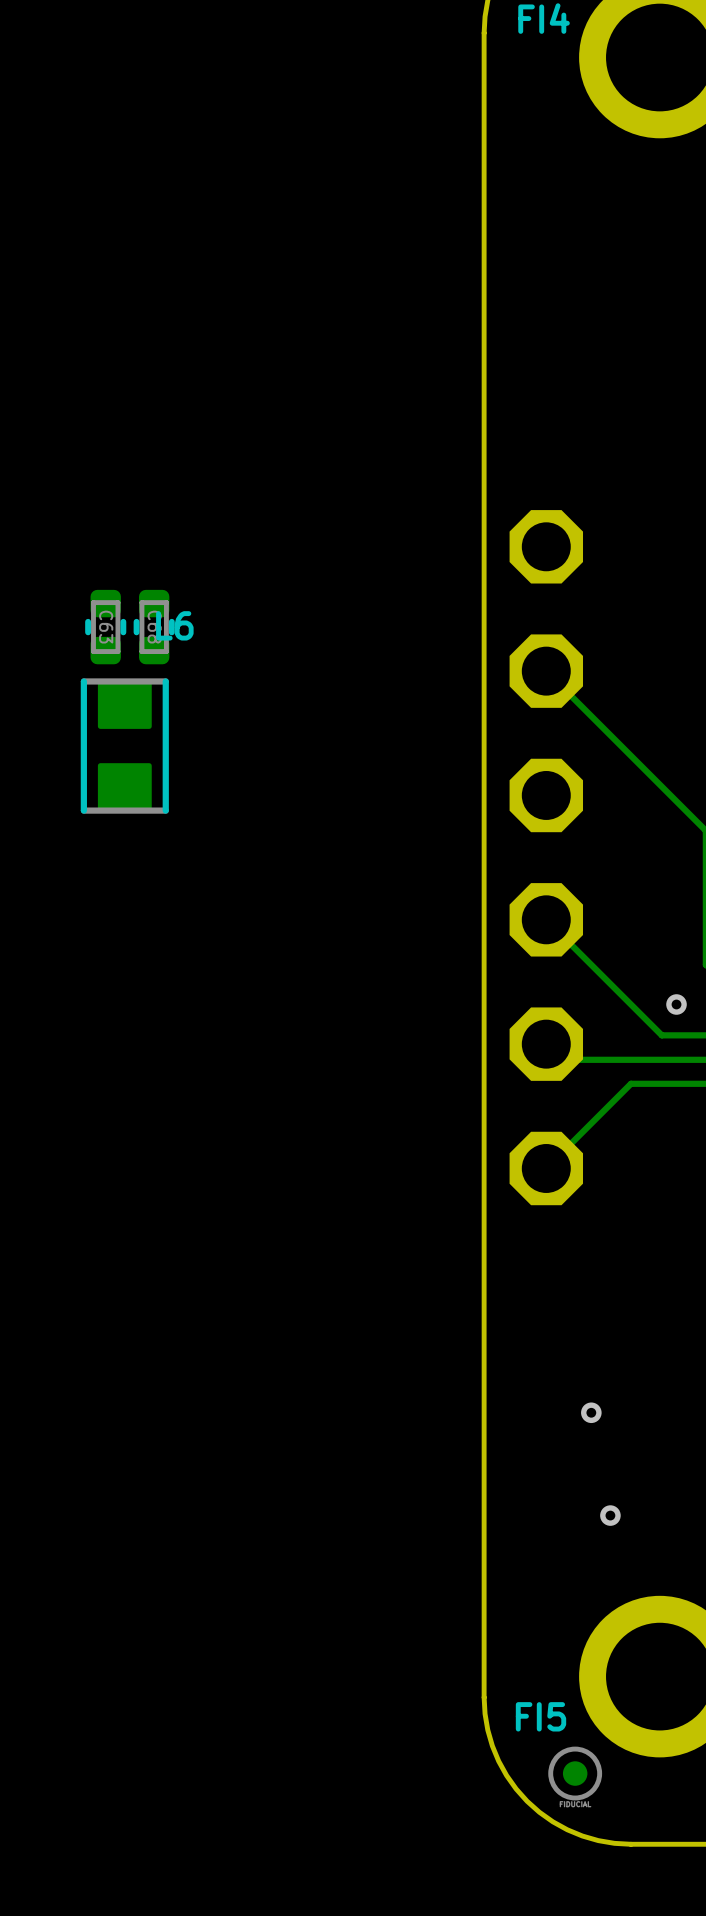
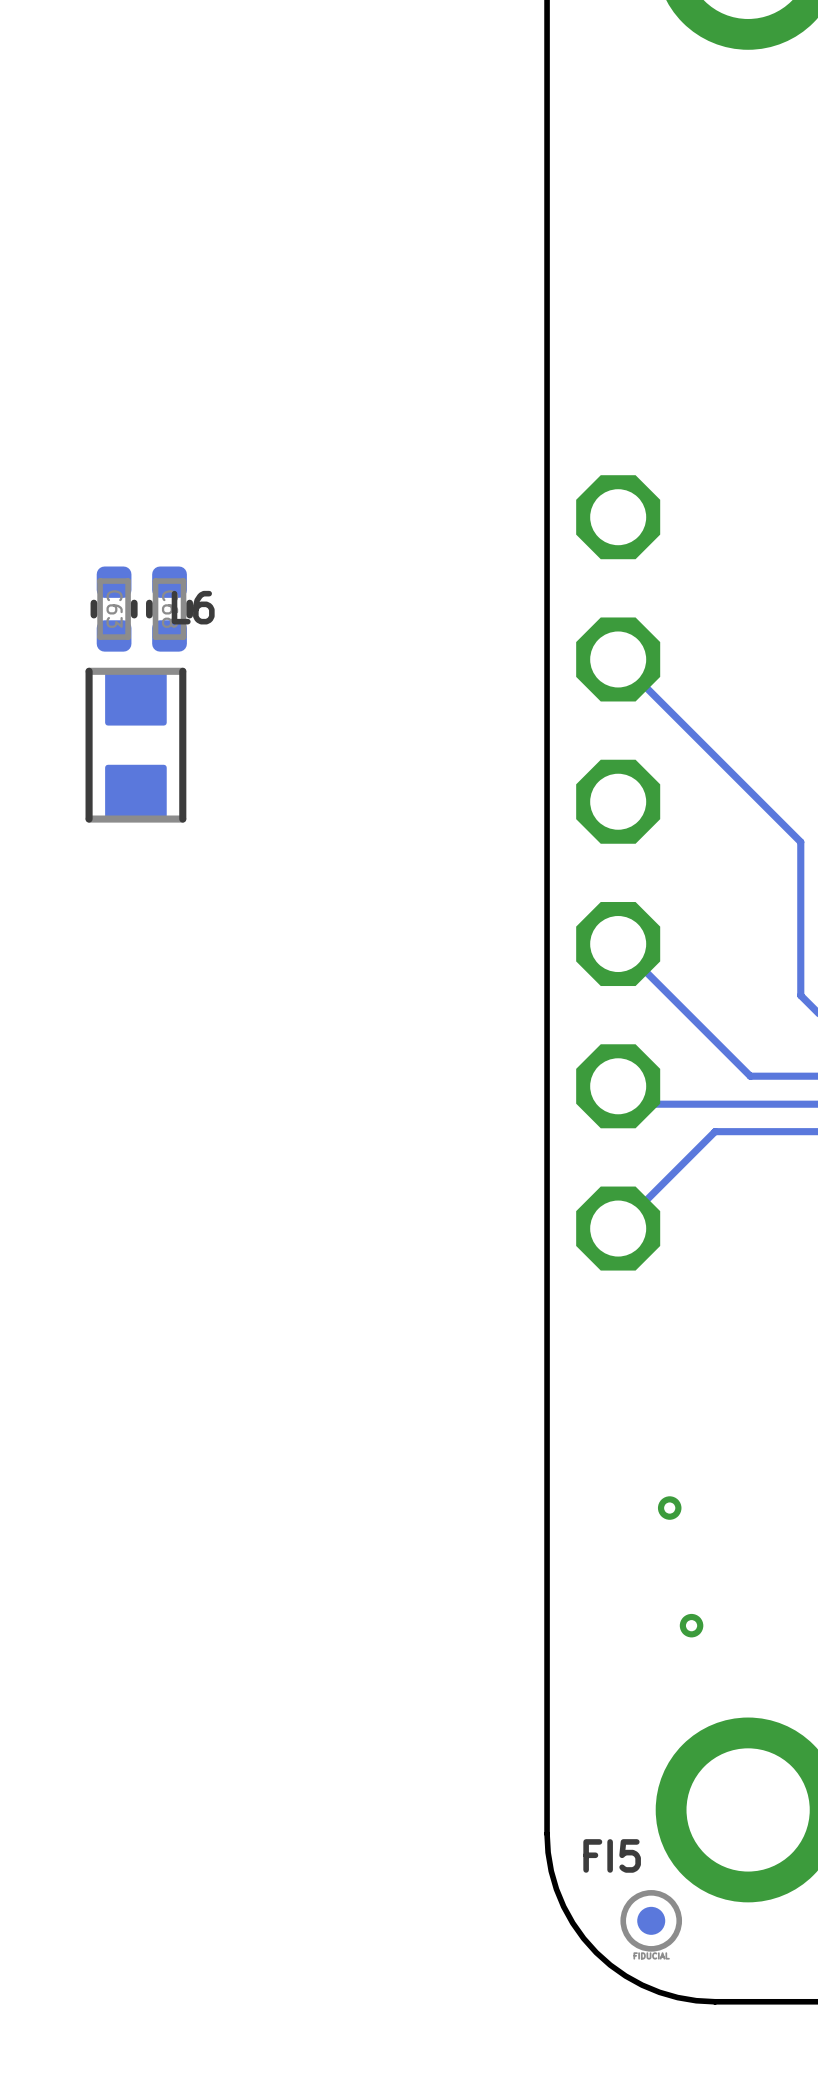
via: (676, 1004) -> none

